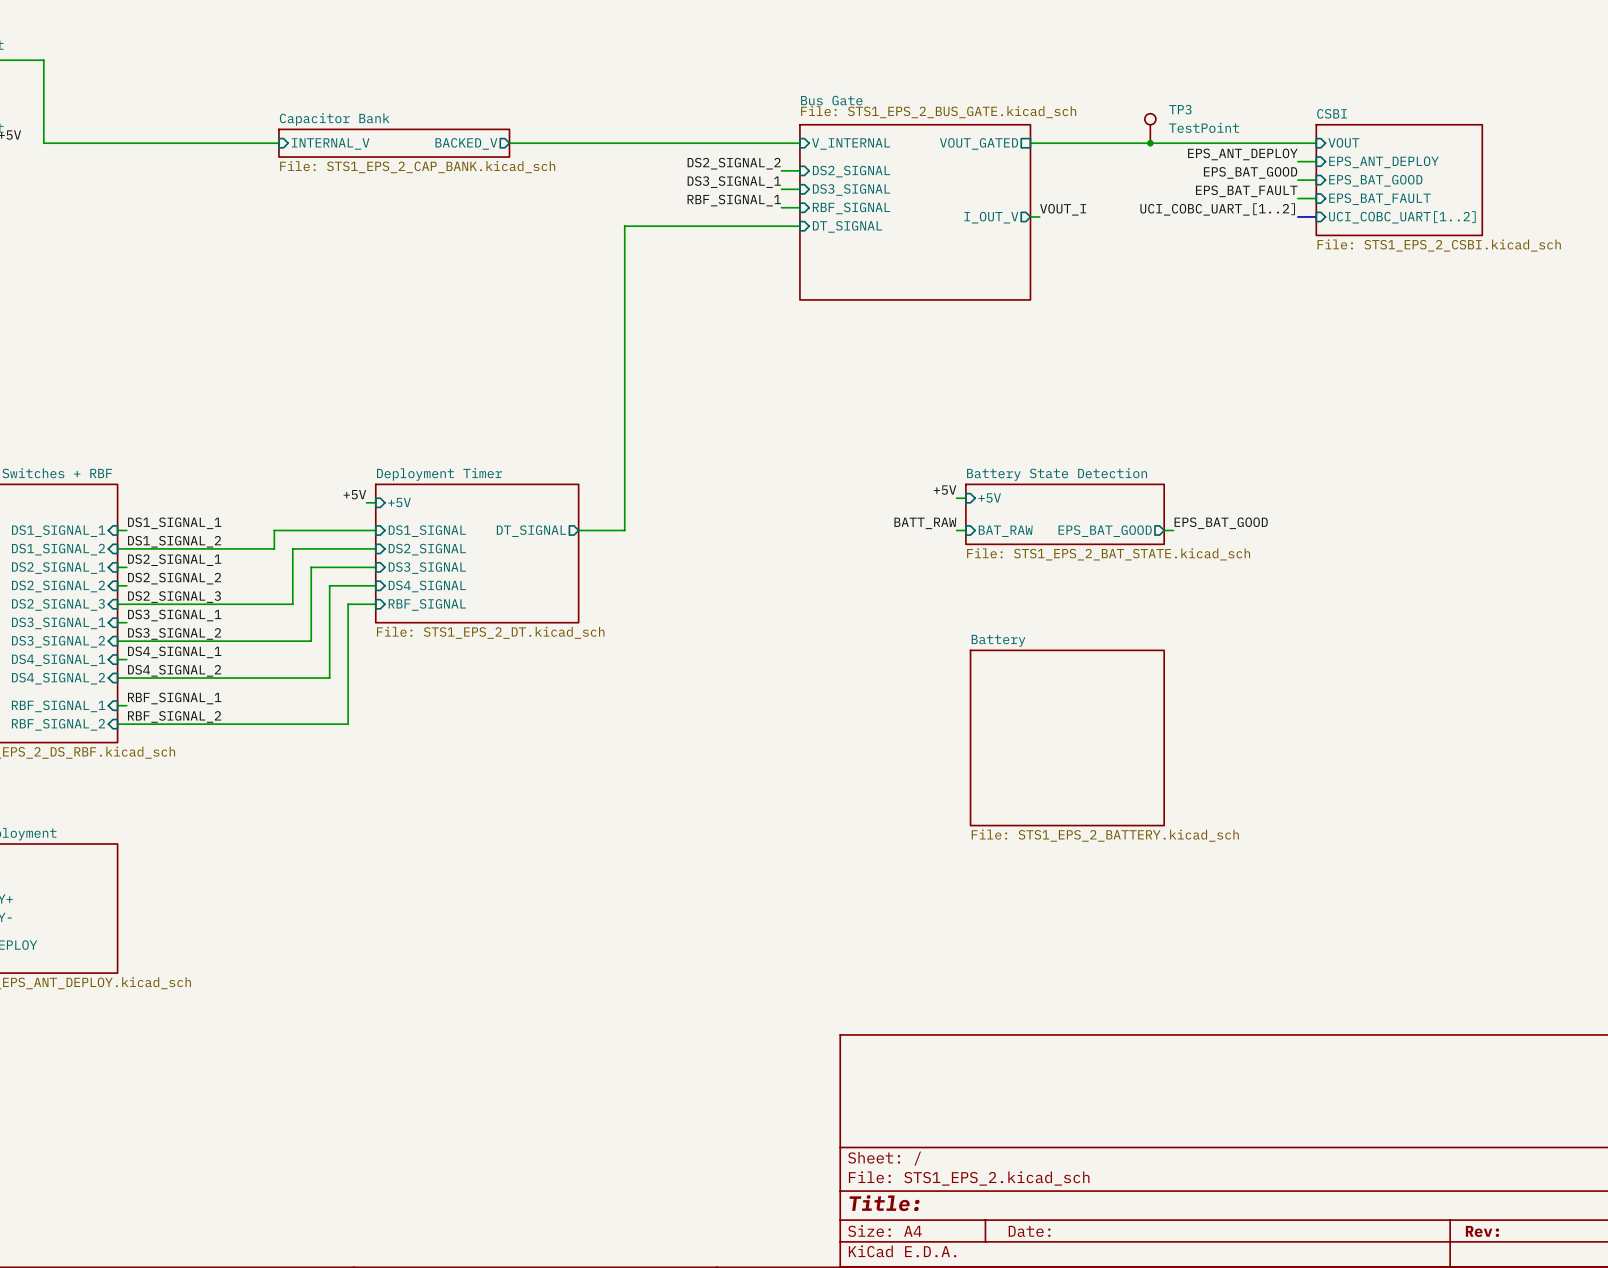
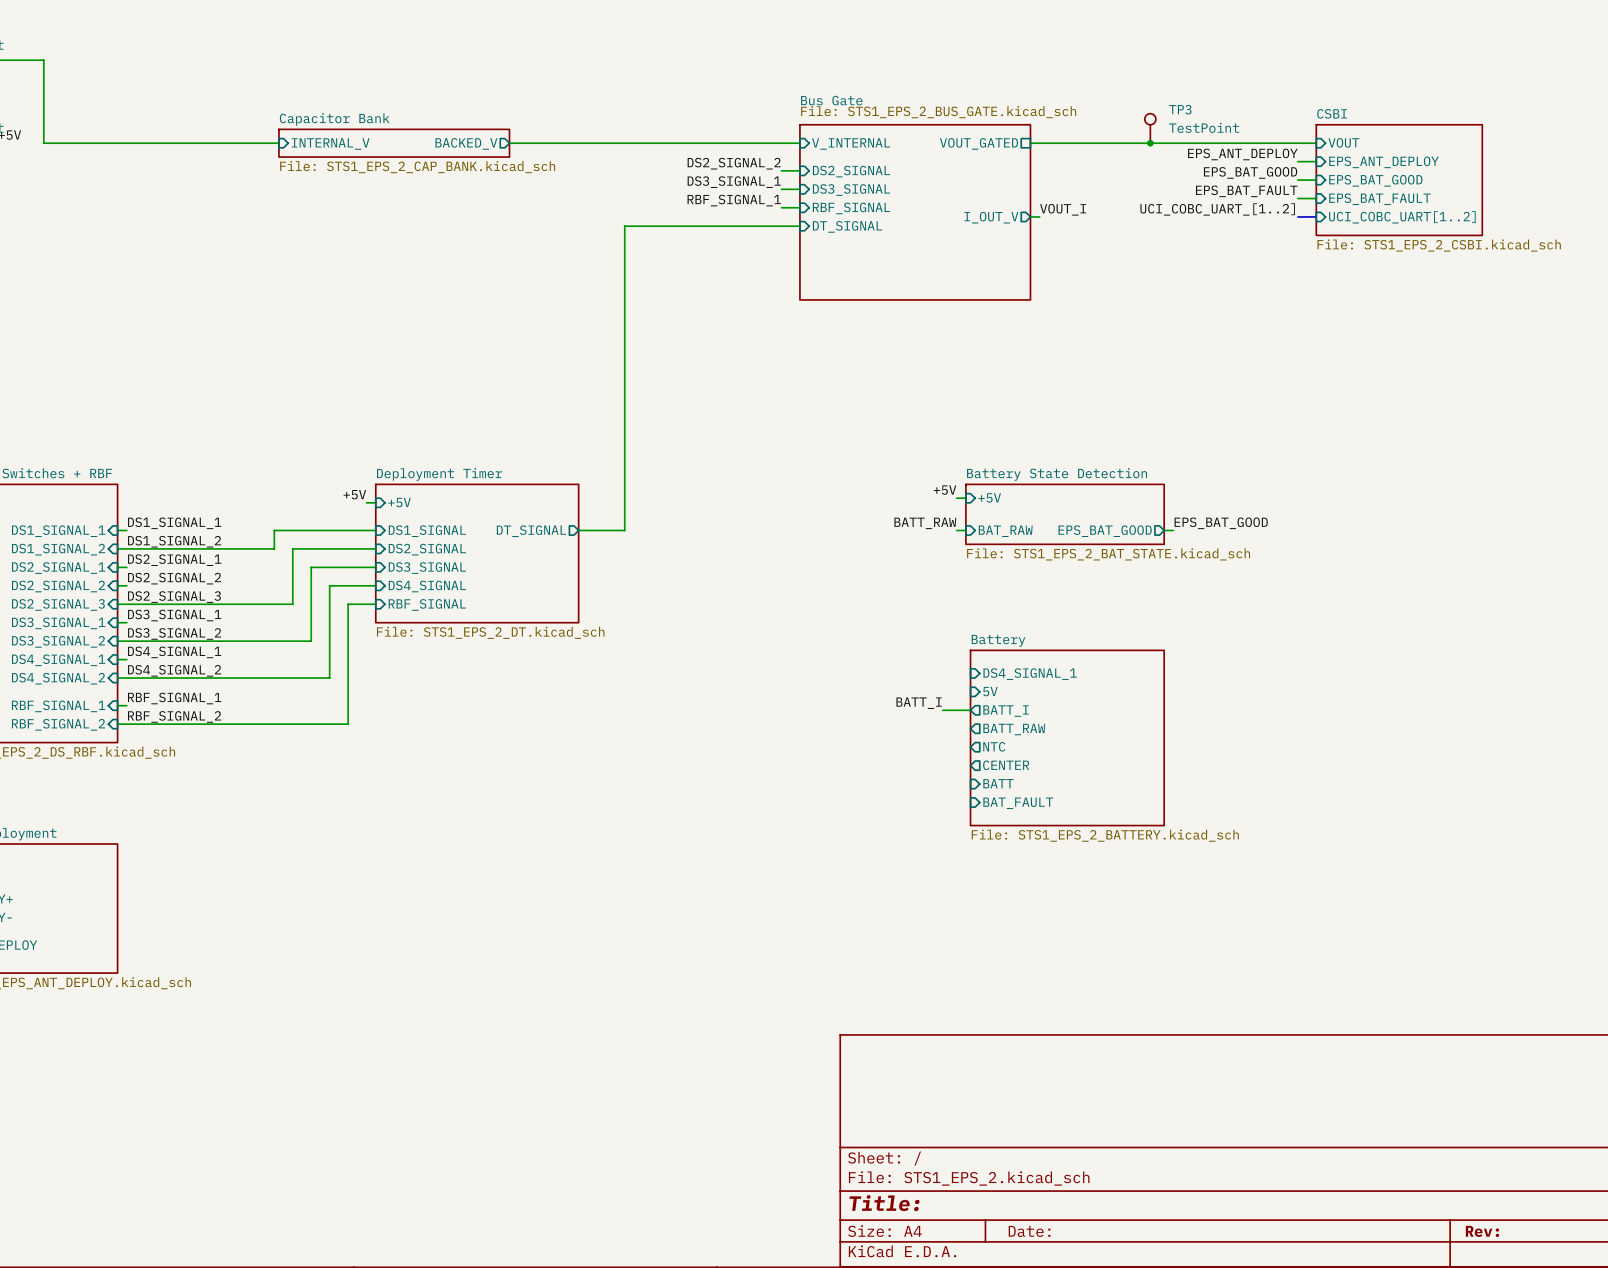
sheet pin: none -> DS4_SIGNAL_1 (1030, 674)
sheet pin: none -> 5V (990, 691)
label: none -> BATT_I (919, 703)
wire: none -> (942, 710) (970, 710)
sheet pin: none -> BATT_I (1006, 711)
sheet pin: none -> BATT_RAW (1014, 729)
sheet pin: none -> NTC (994, 746)
sheet pin: none -> CENTER (1006, 765)
sheet pin: none -> BATT (998, 783)
sheet pin: none -> BAT_FAULT (1018, 803)

